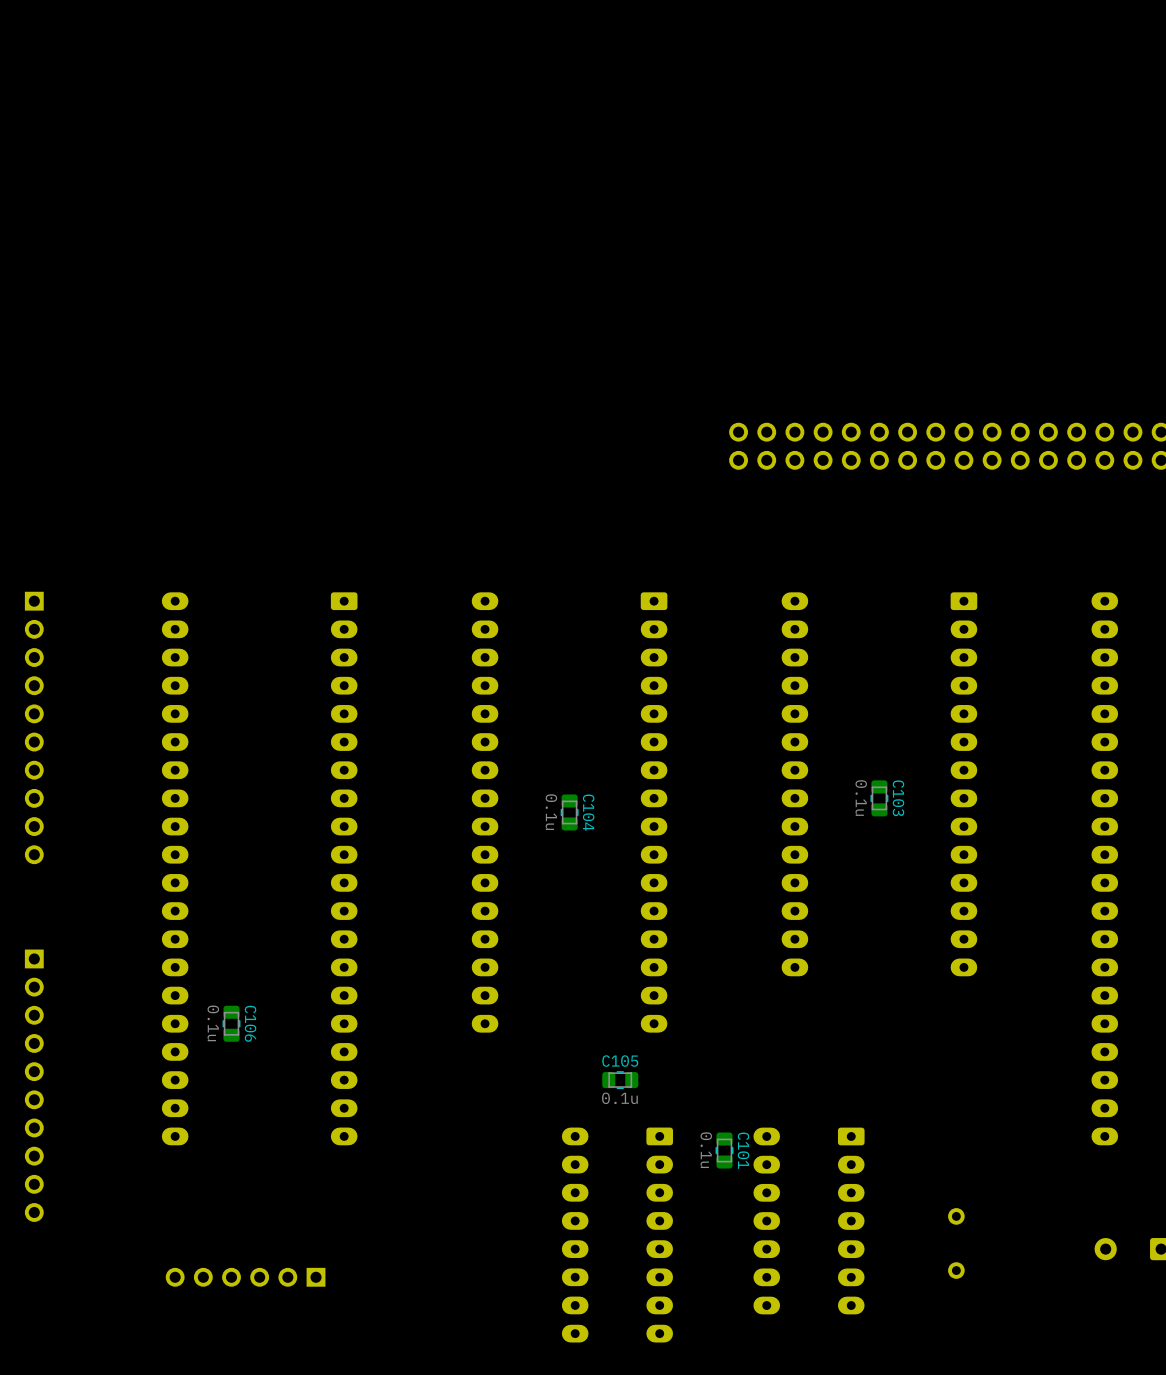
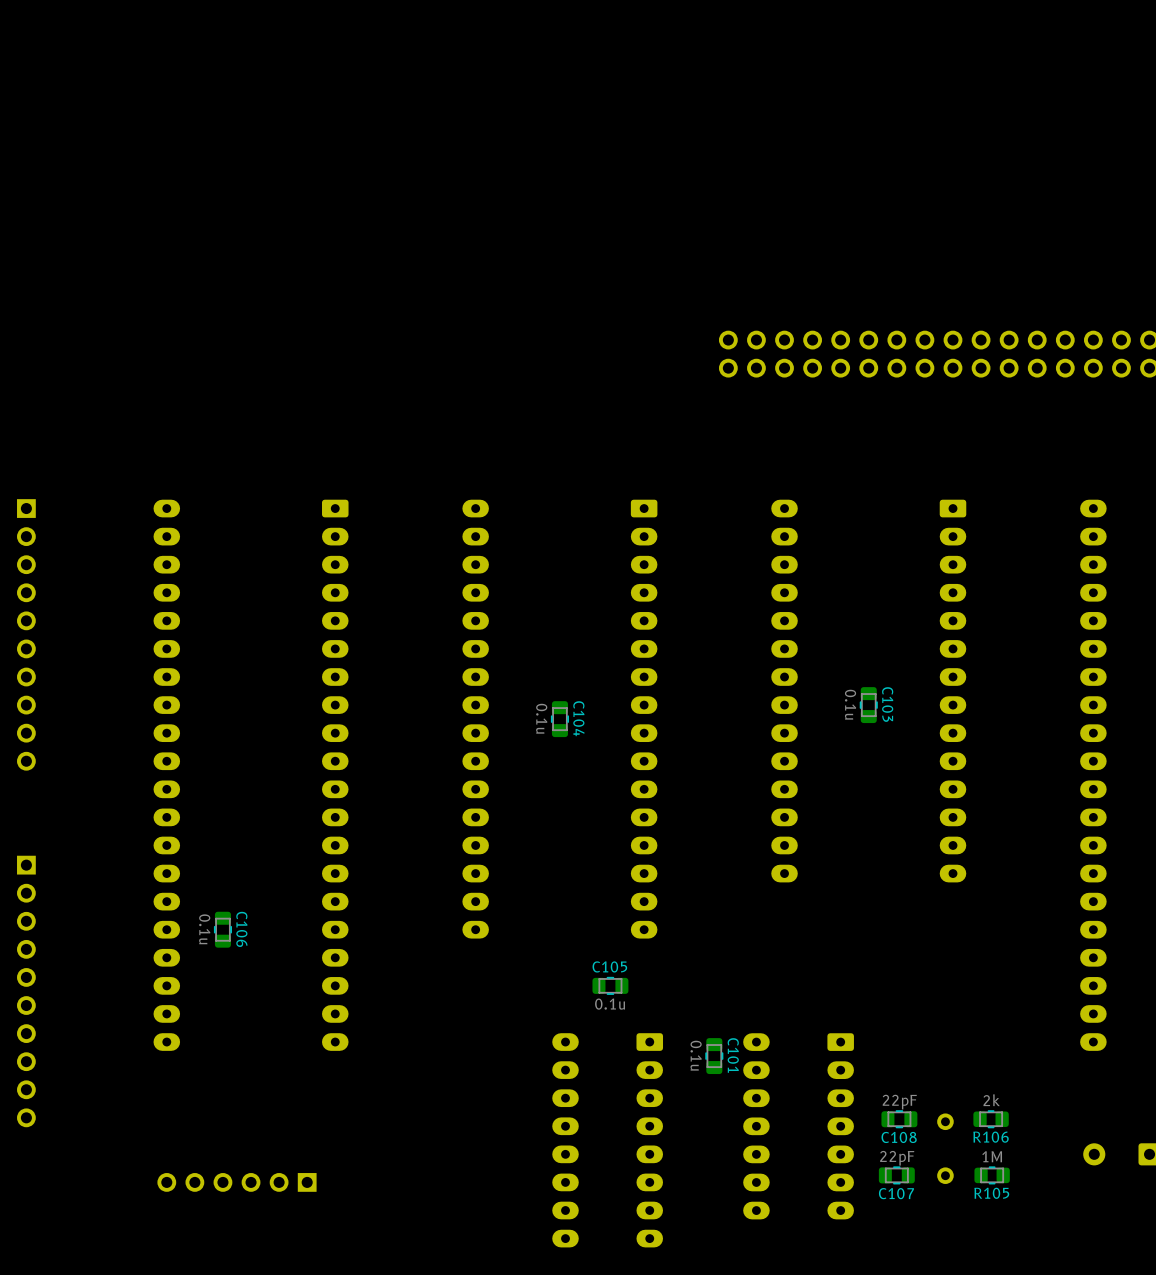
C108: none -> 22pF (899, 1119)
R106: none -> 2k (991, 1119)
C107: none -> 22pF (896, 1175)
R105: none -> 1M (992, 1175)

